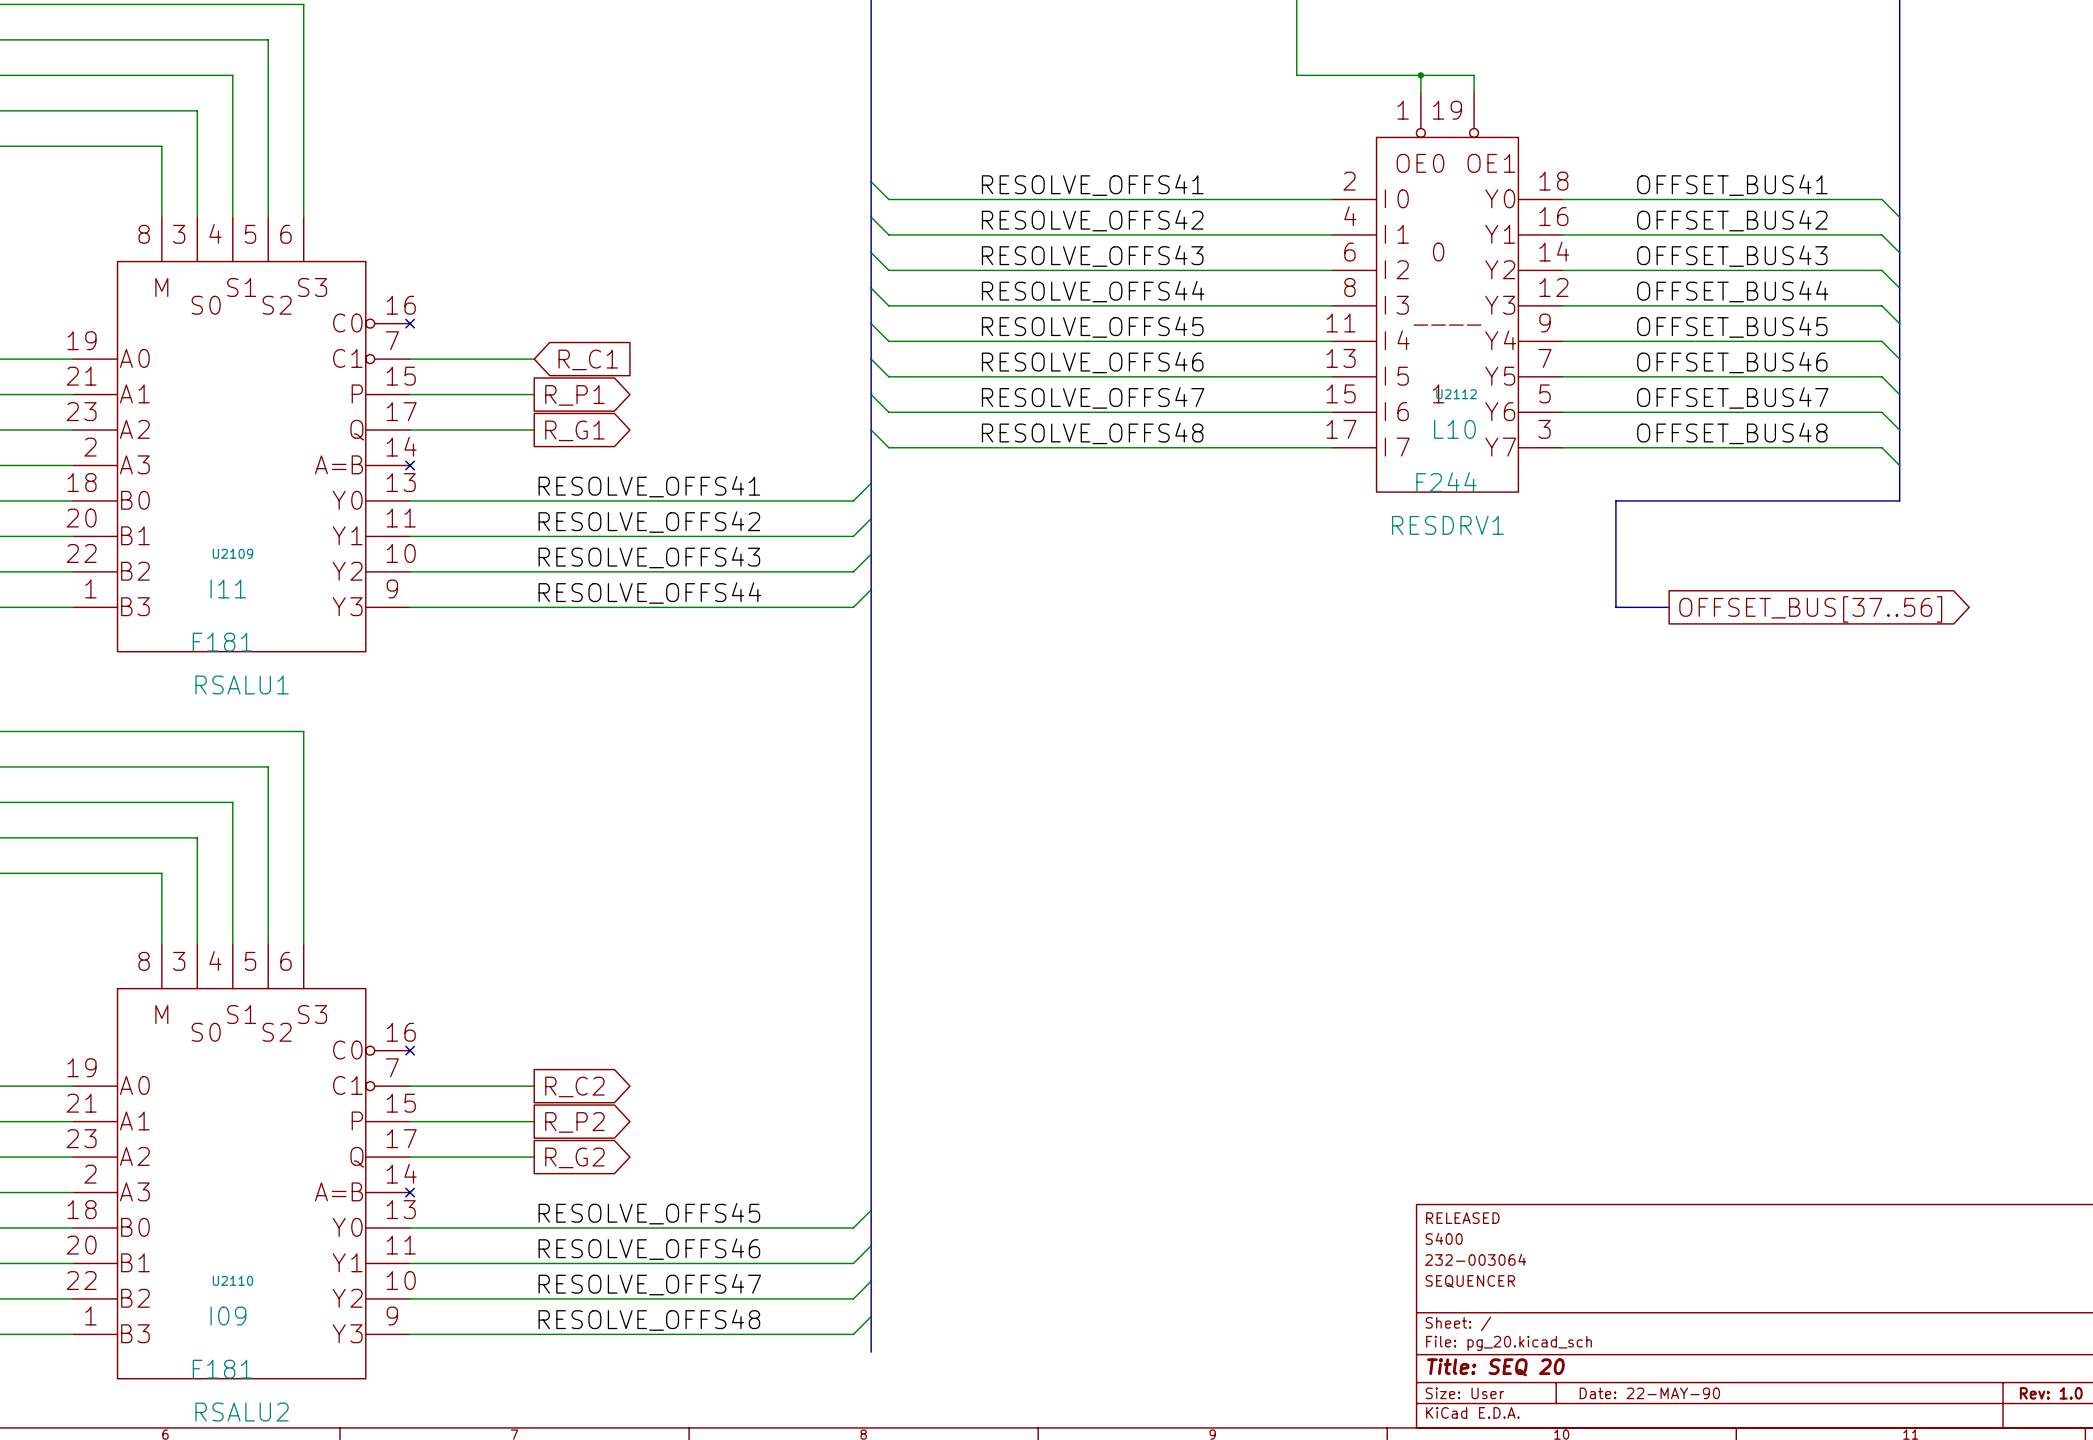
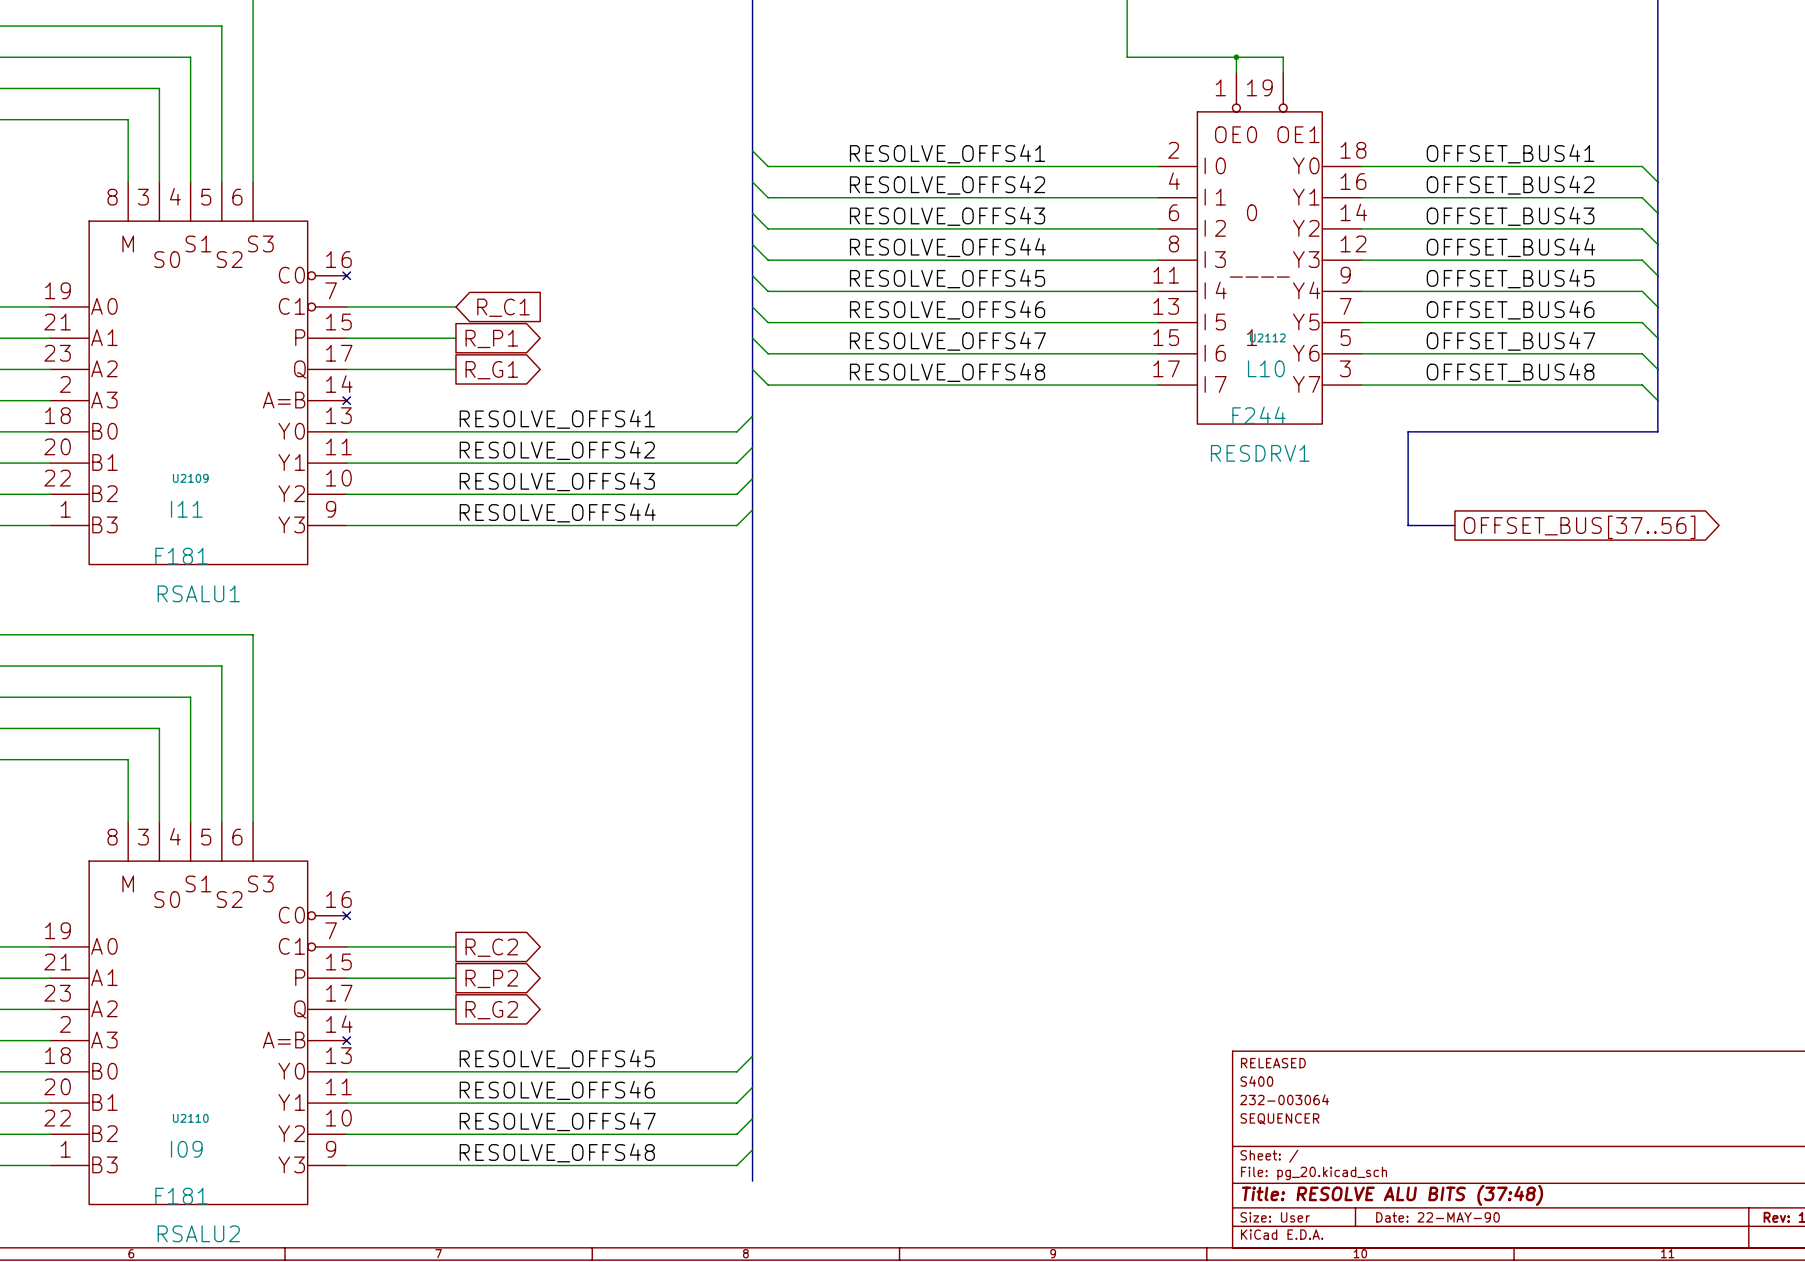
title block: Title: SEQ 20 (1495, 1367) -> Title: RESOLVE ALU BITS (37:48) (1392, 1195)

